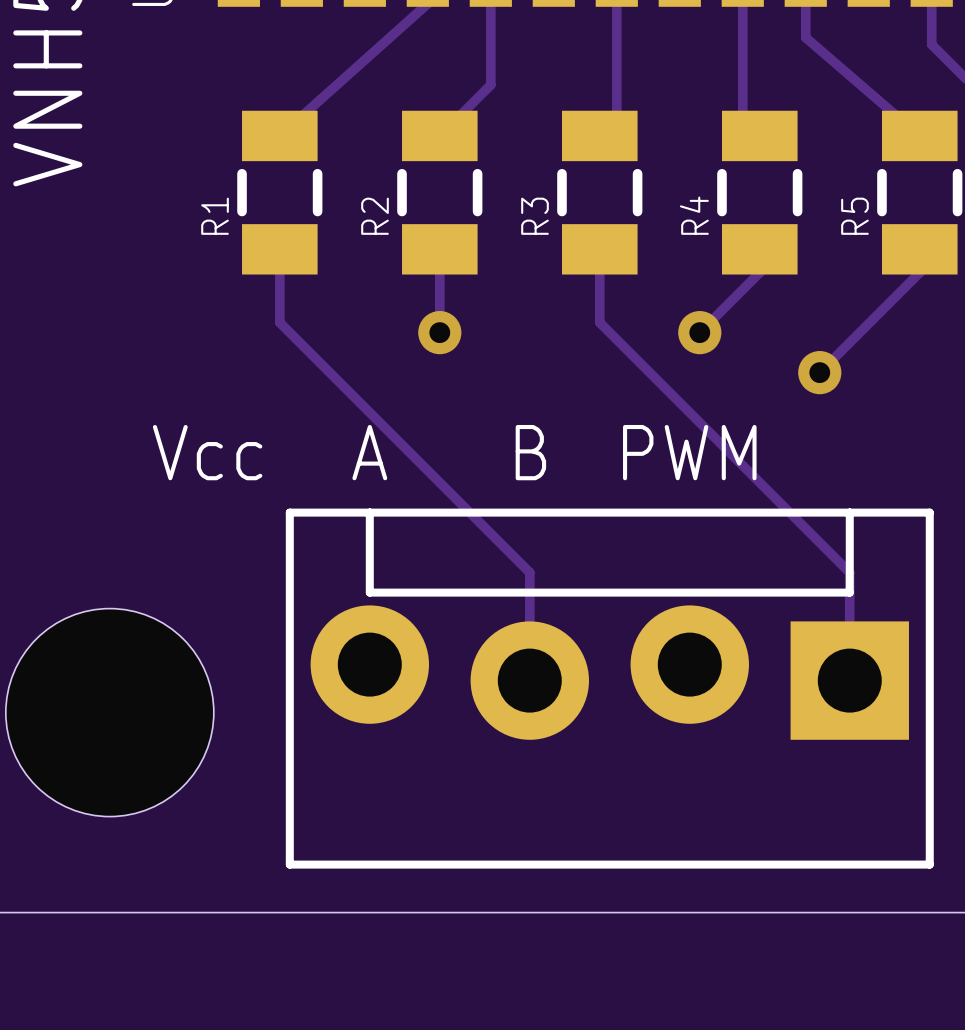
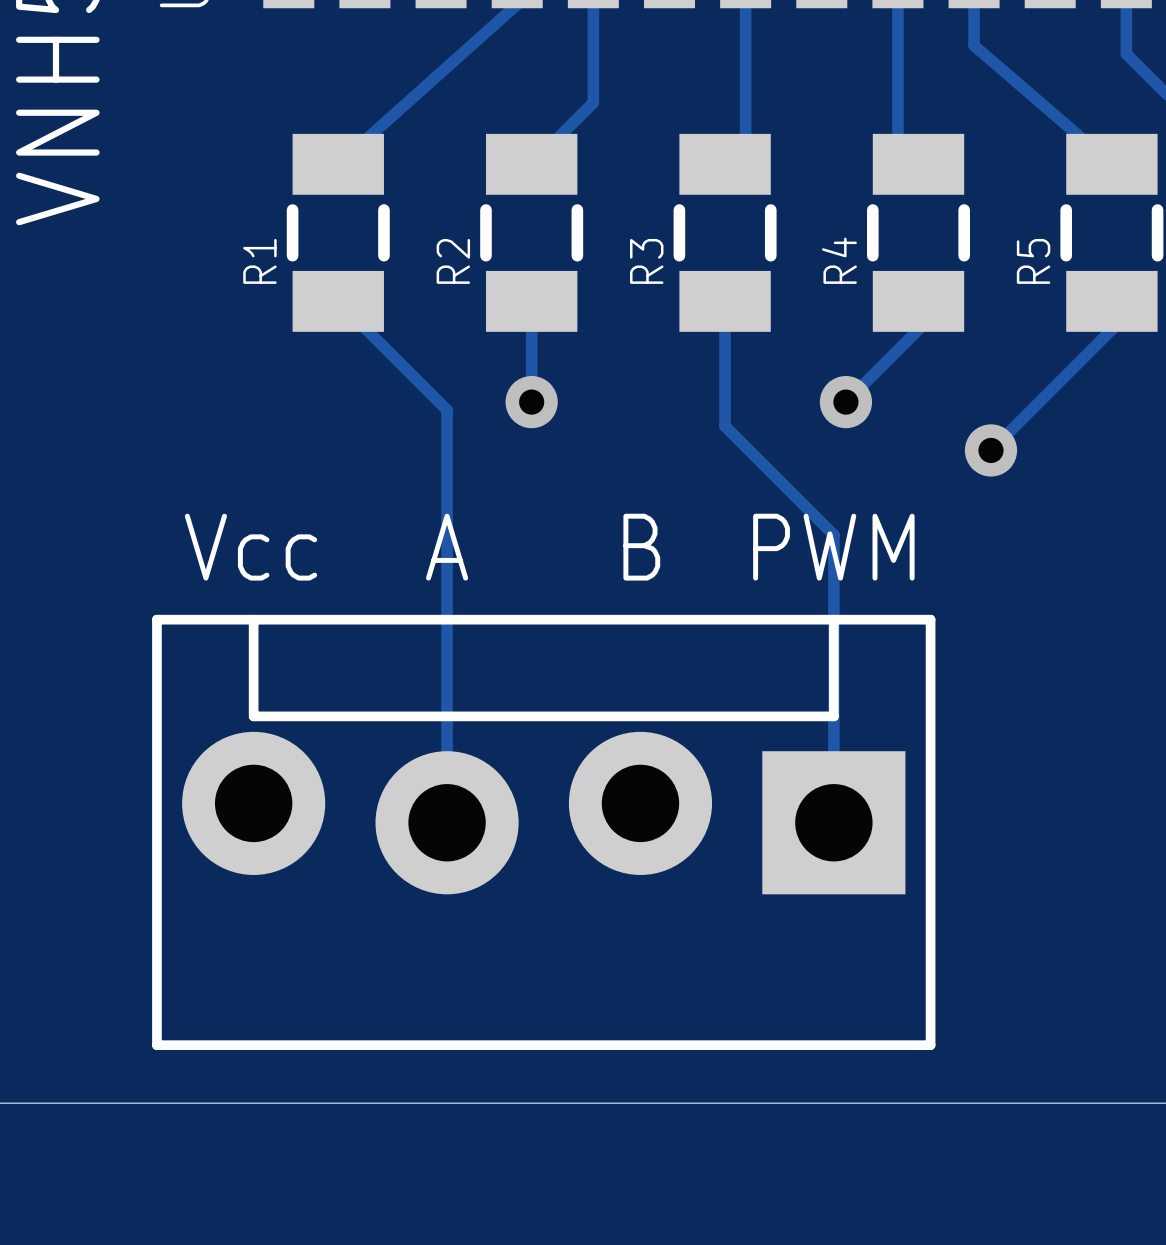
track: (279, 249) (279, 322) (529, 572) (529, 680) -> (338, 301) (447, 410) (447, 822)
track: (599, 322) (849, 572) (849, 680) -> (725, 390) (725, 426) (833, 535) (833, 822)
part position: (609, 688) -> (543, 832)
part: (109, 712) -> none

